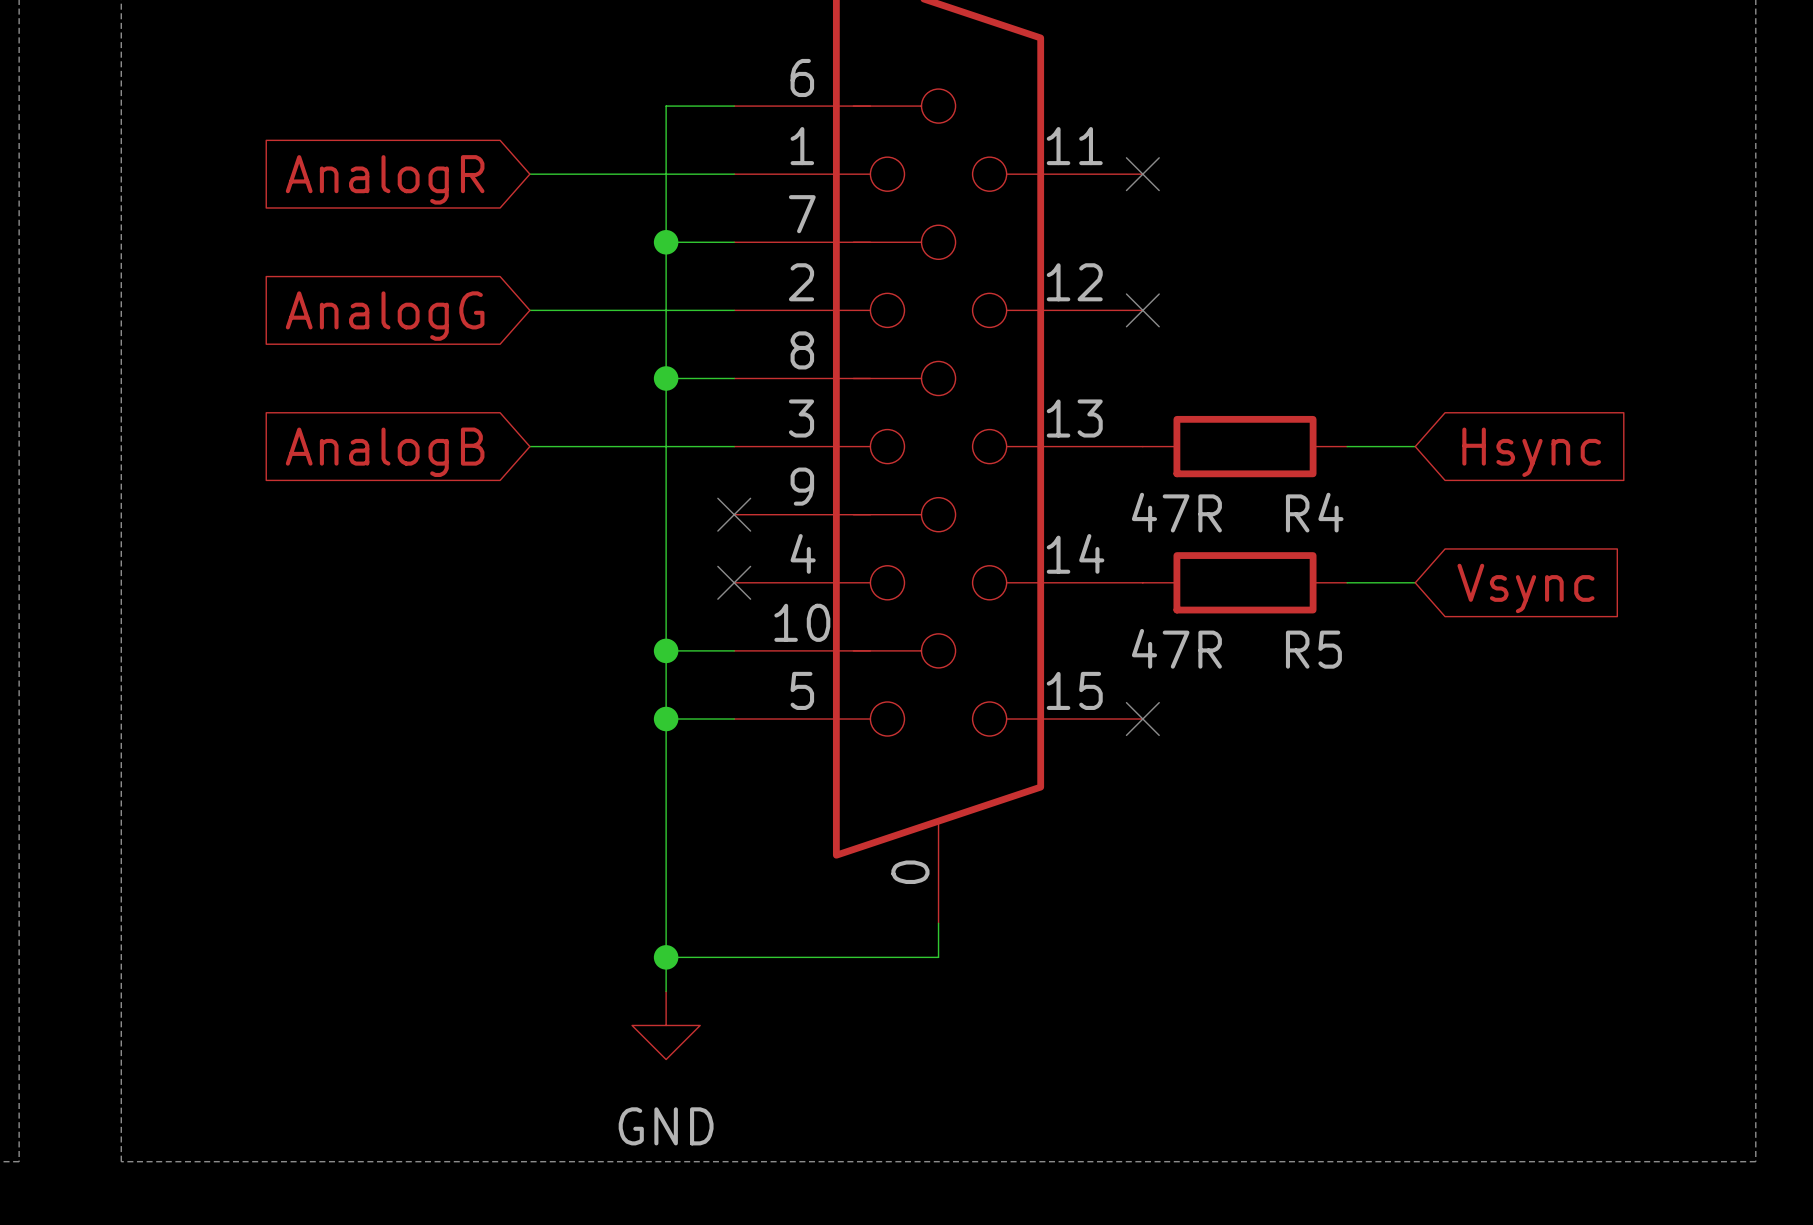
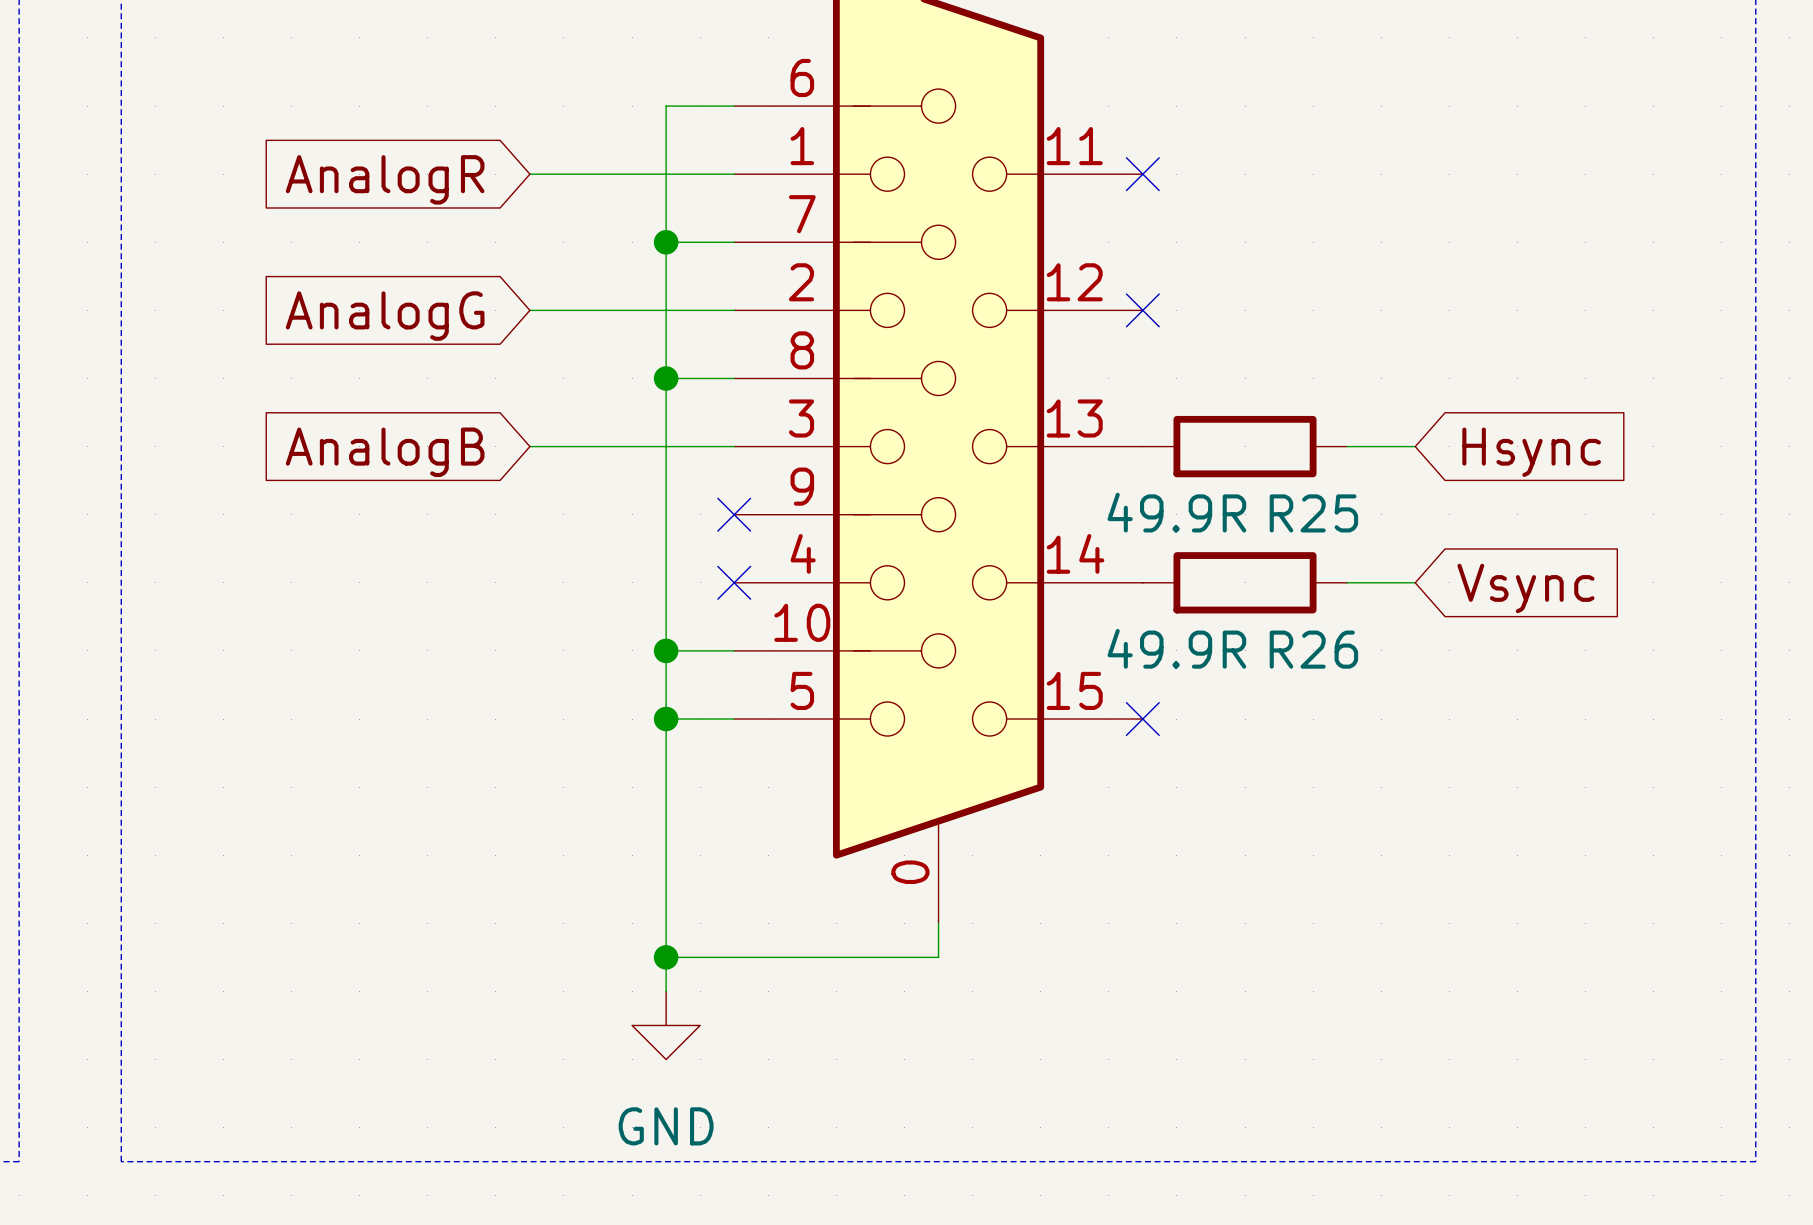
R4 value: 47R (1176, 512) -> 49.9R (1176, 512)
R4 name: R4 (1314, 512) -> R25 (1313, 513)
R5 value: 47R (1176, 648) -> 49.9R (1176, 648)
R5 name: R5 (1313, 649) -> R26 (1313, 649)

